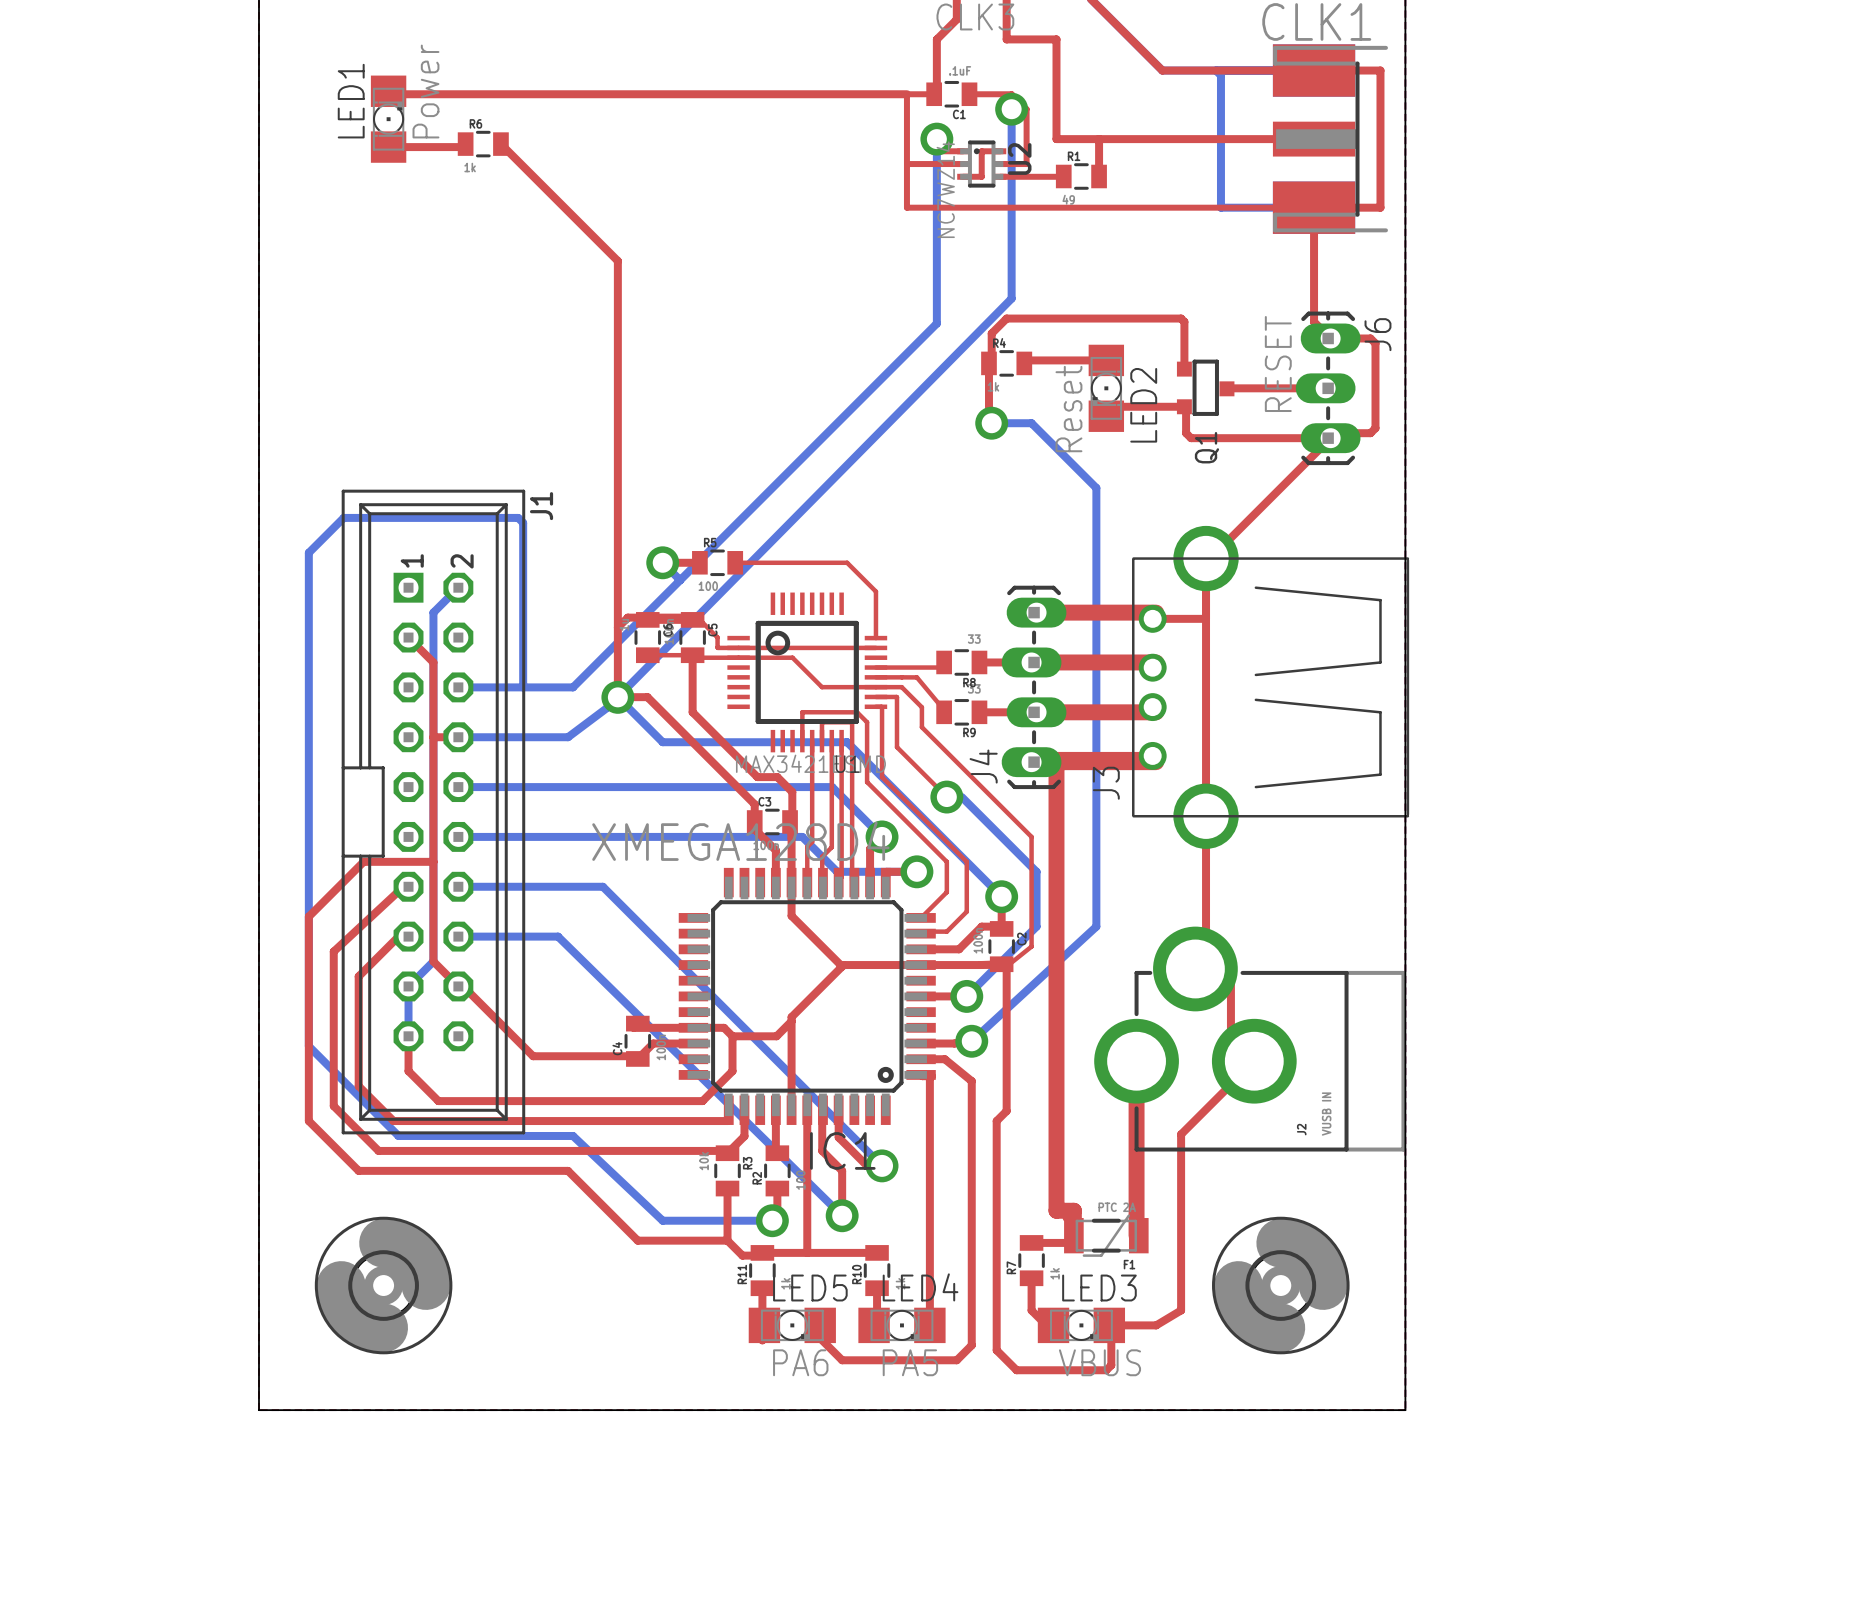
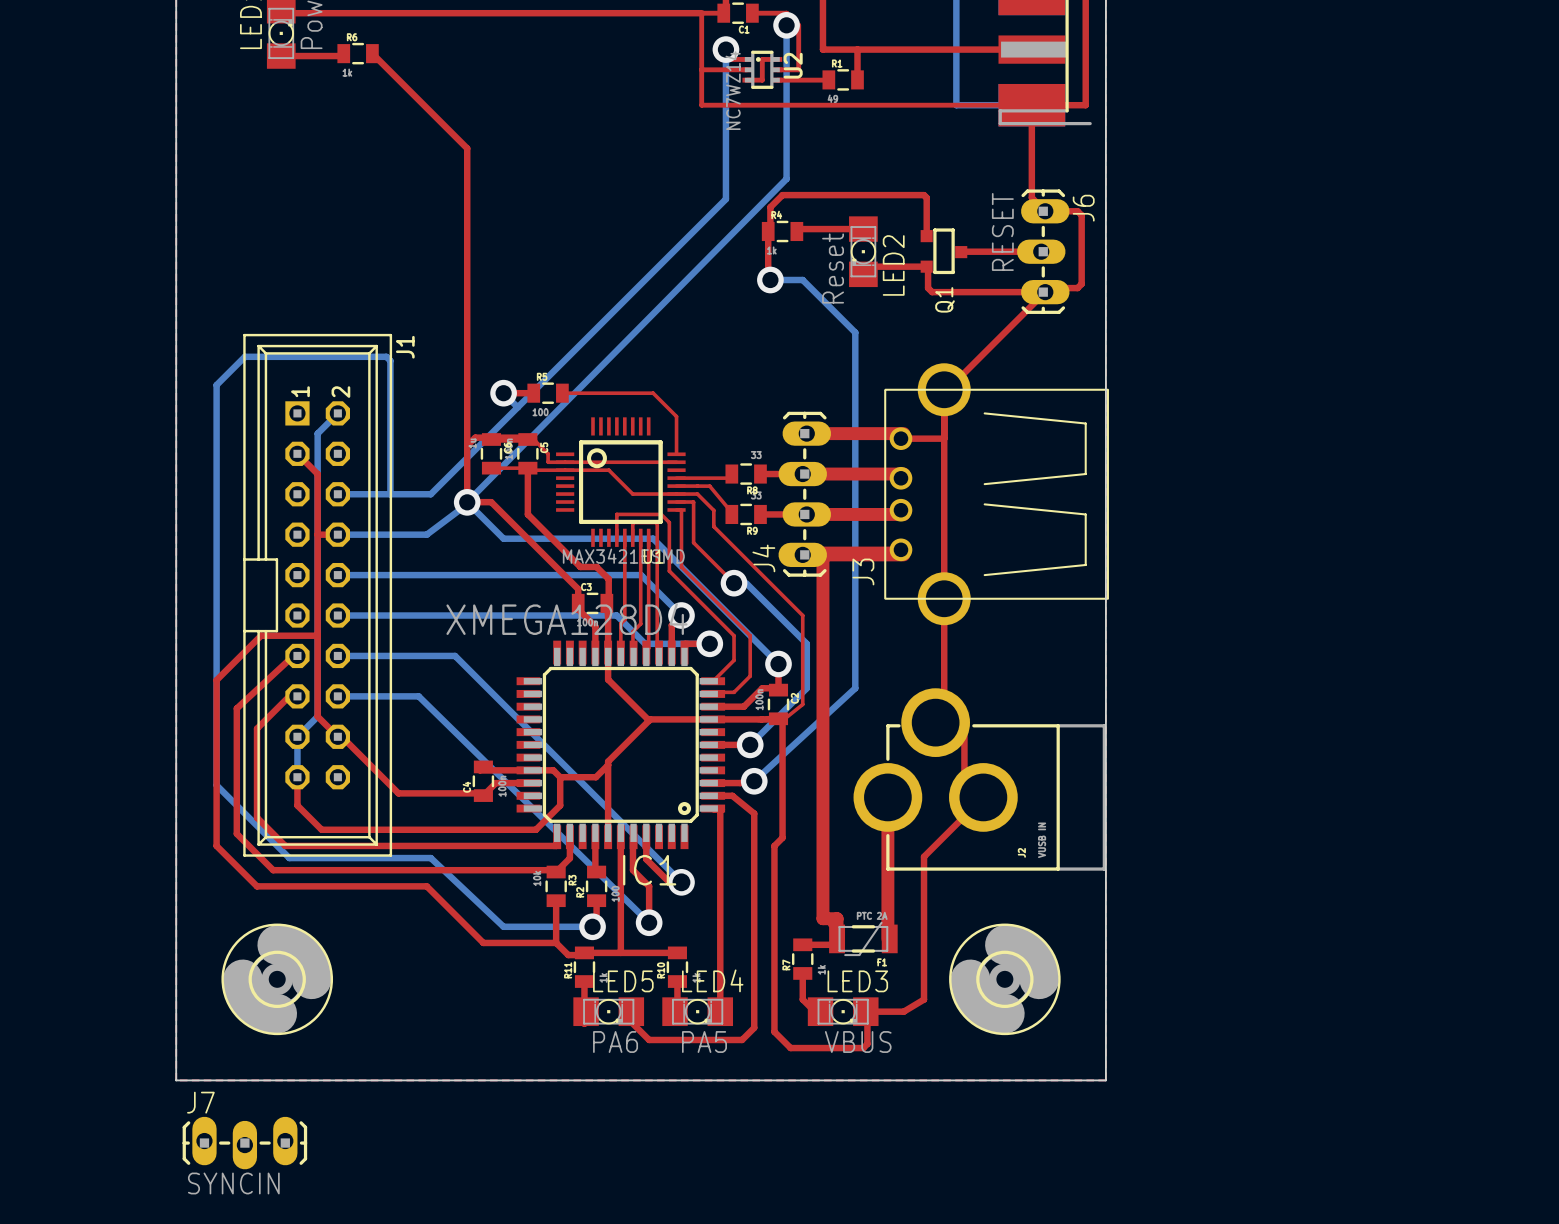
J7: none -> SYNCIN (244, 1143)

